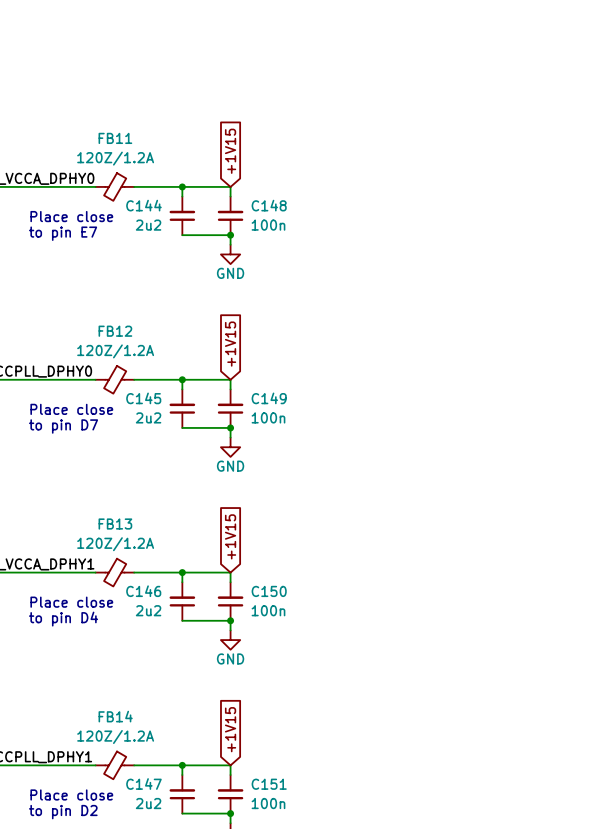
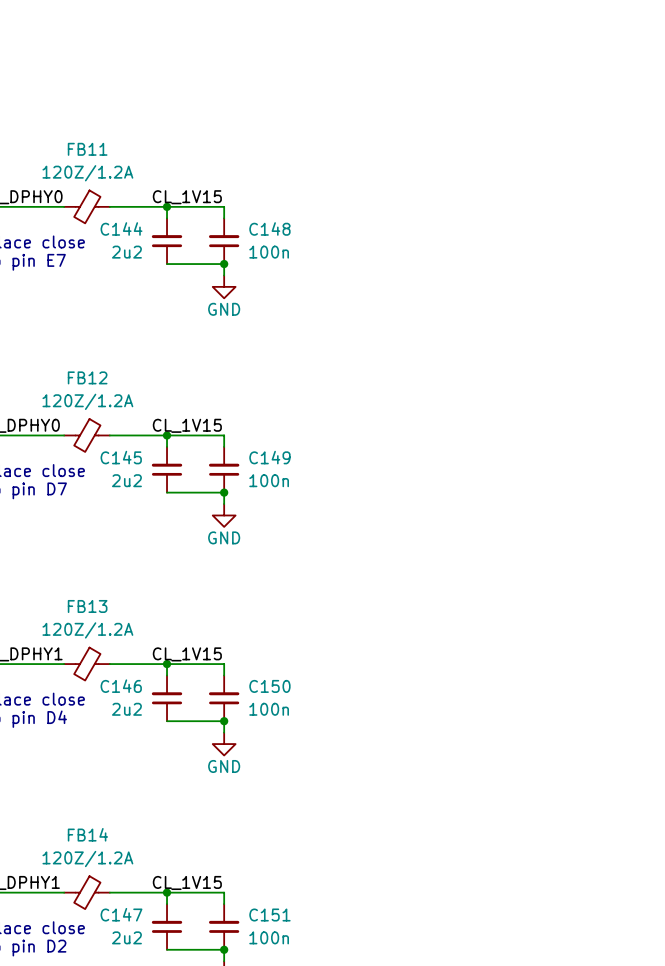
global label: +1V15 (230, 151) -> none
label: none -> CL_1V15 (187, 197)
global label: +1V15 (230, 344) -> none
label: none -> CL_1V15 (187, 425)
global label: +1V15 (230, 536) -> none
label: none -> CL_1V15 (187, 654)
global label: +1V15 (230, 729) -> none
label: none -> CL_1V15 (187, 882)

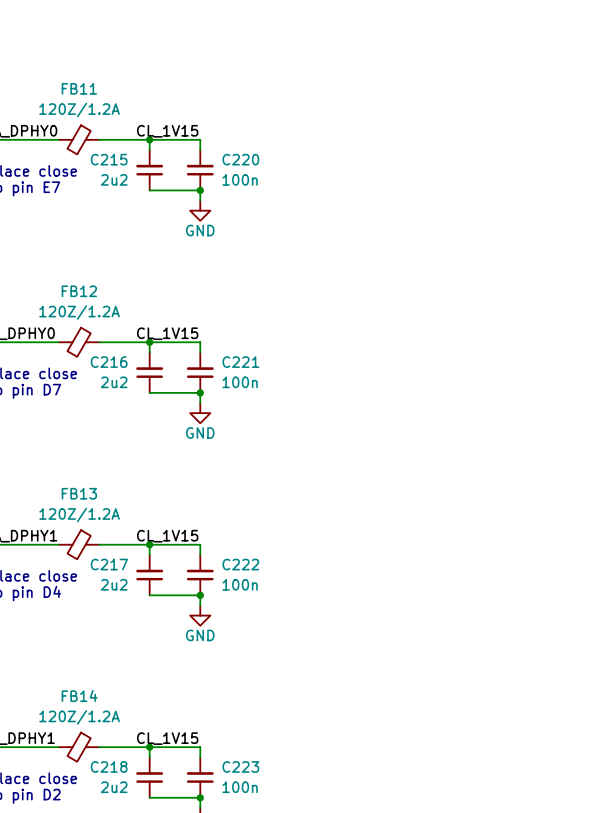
C144 name: C144 (121, 228) -> C215 (109, 159)
C148 name: C148 (269, 228) -> C220 (240, 159)
C145 name: C145 (121, 457) -> C216 (109, 362)
C149 name: C149 (269, 457) -> C221 (240, 362)
C146 name: C146 (121, 686) -> C217 (109, 564)
C150 name: C150 (269, 686) -> C222 (240, 564)
C147 name: C147 (121, 914) -> C218 (109, 766)
C151 name: C151 (269, 915) -> C223 (240, 766)

